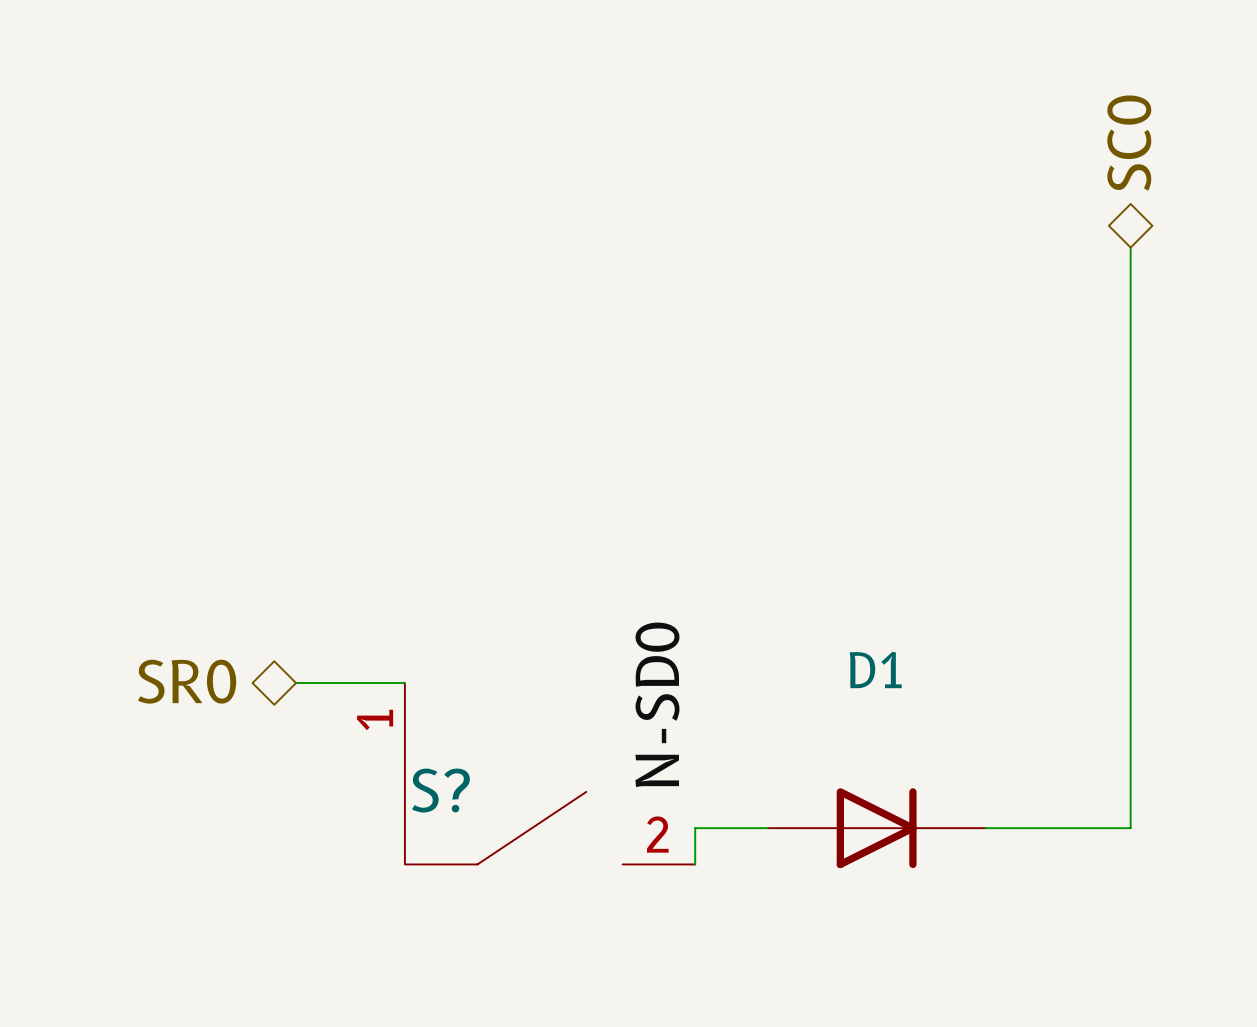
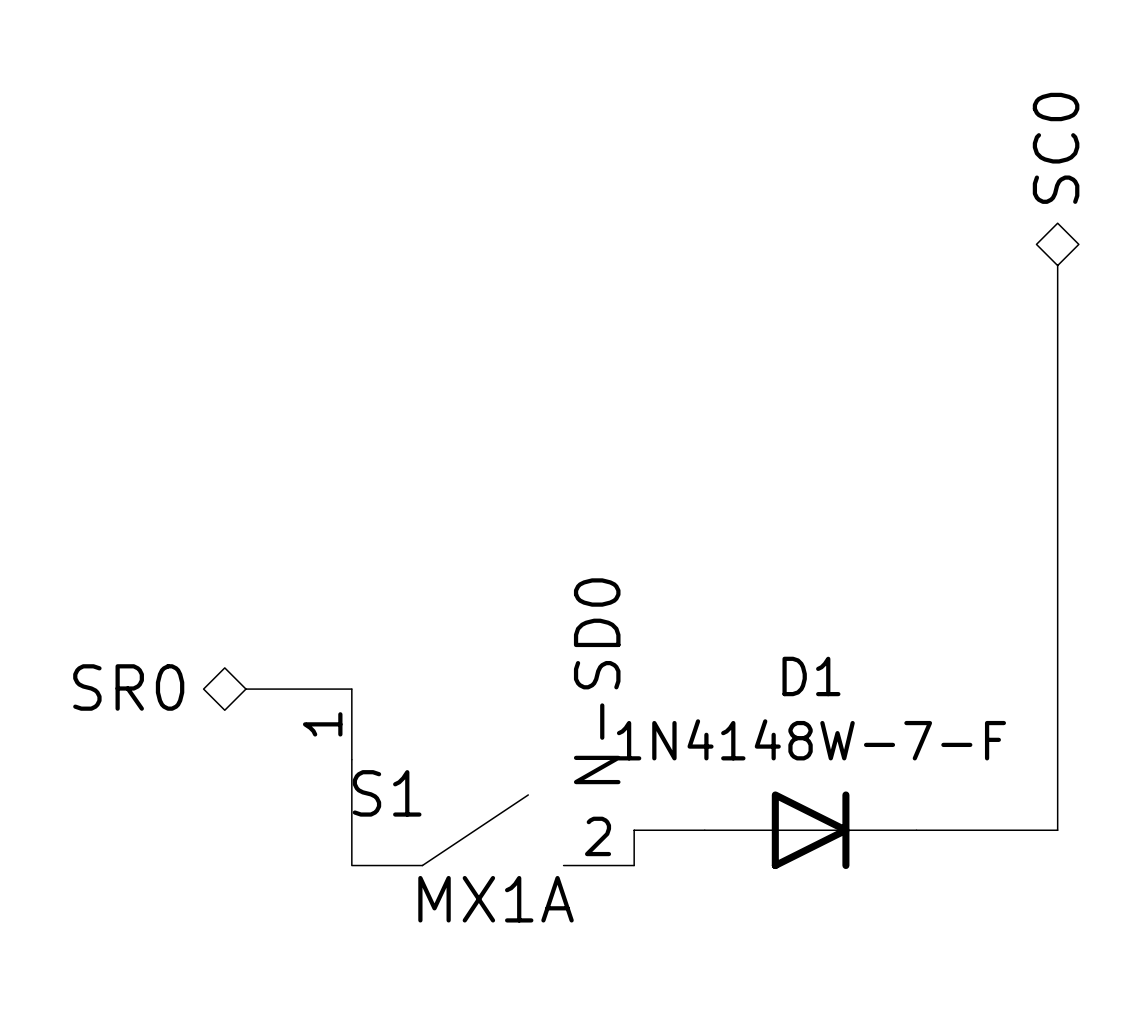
D1 value: none -> 1N4148W-7-F (811, 739)
S? name: S? (440, 790) -> S1 (387, 793)
S? value: none -> MX1A (496, 899)

